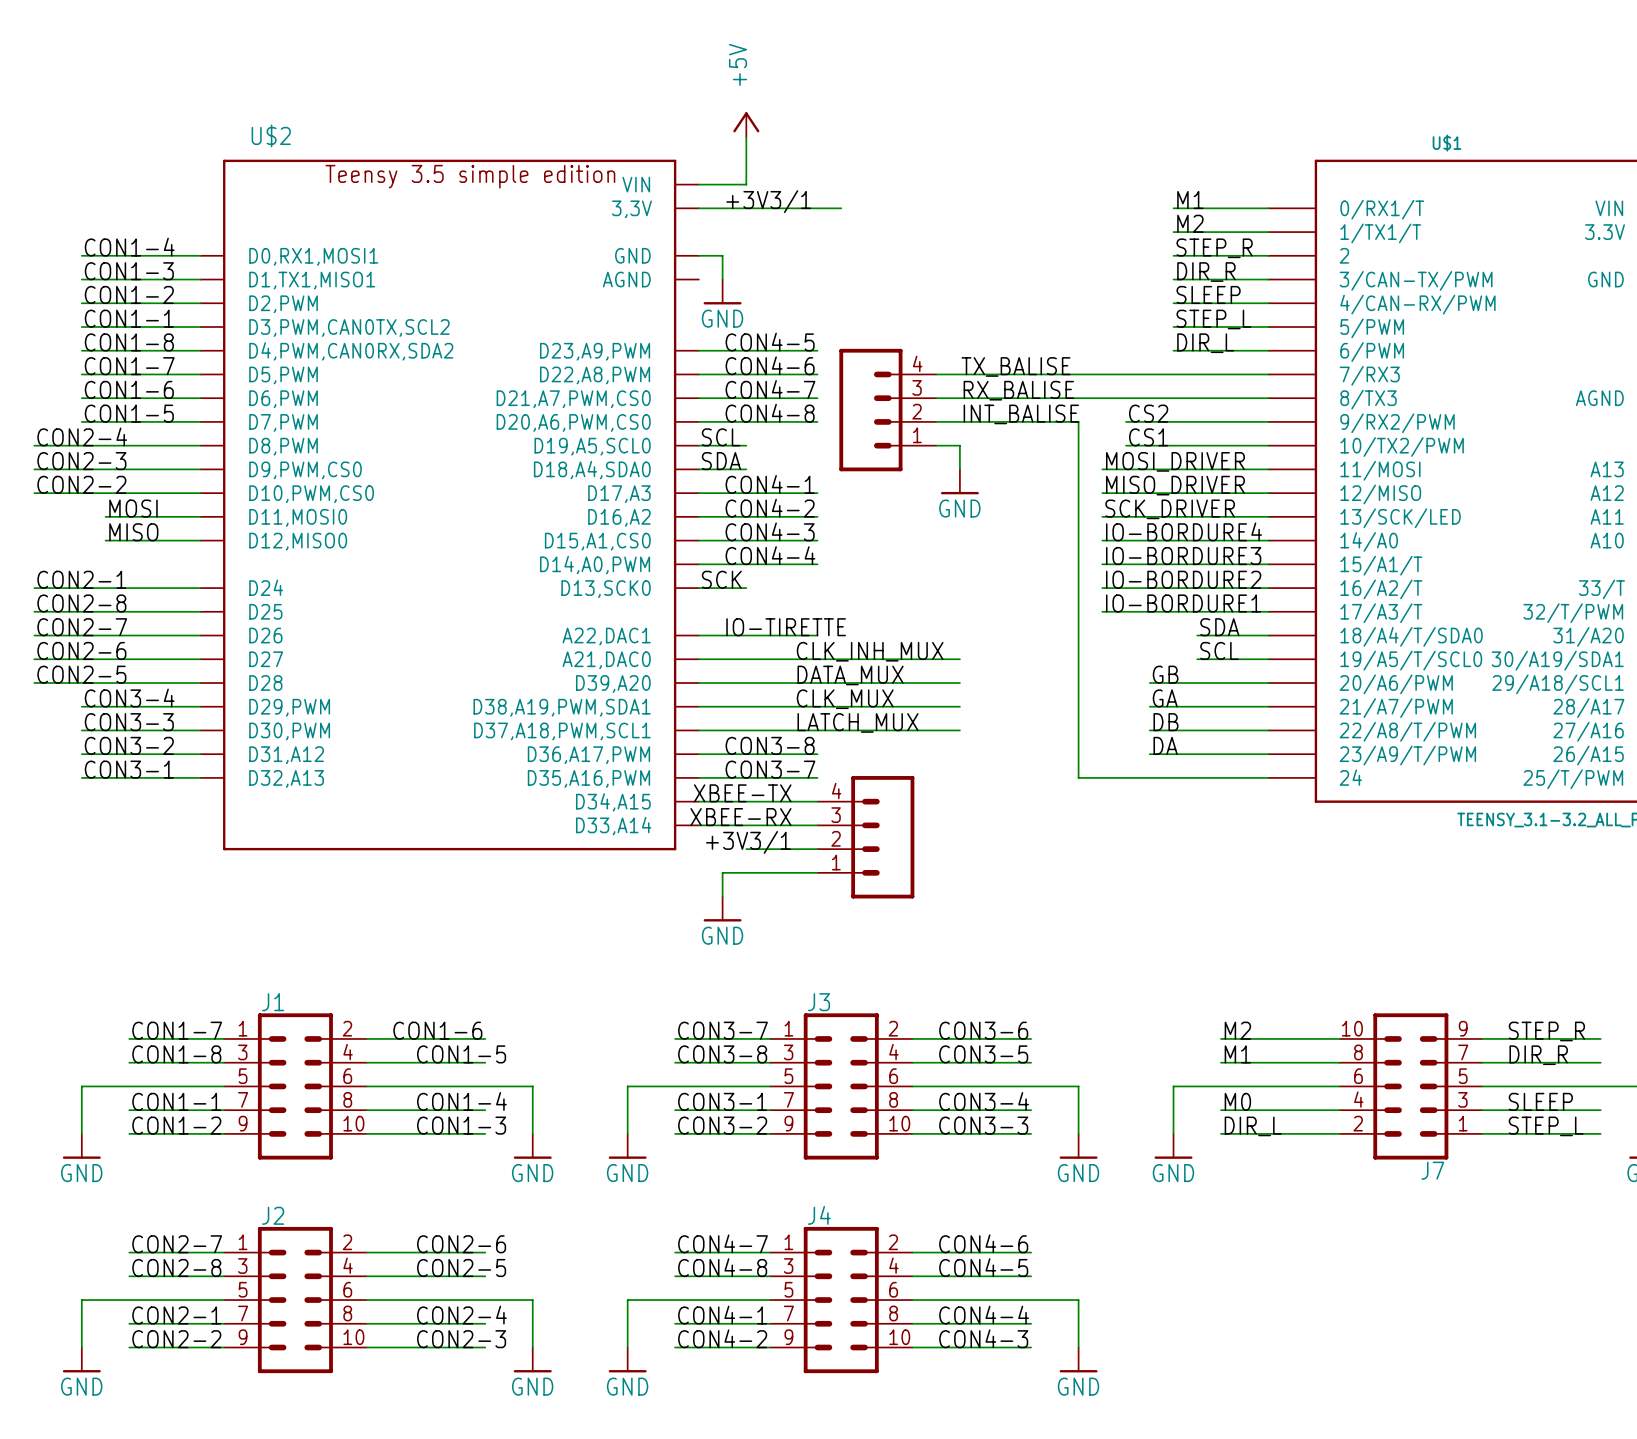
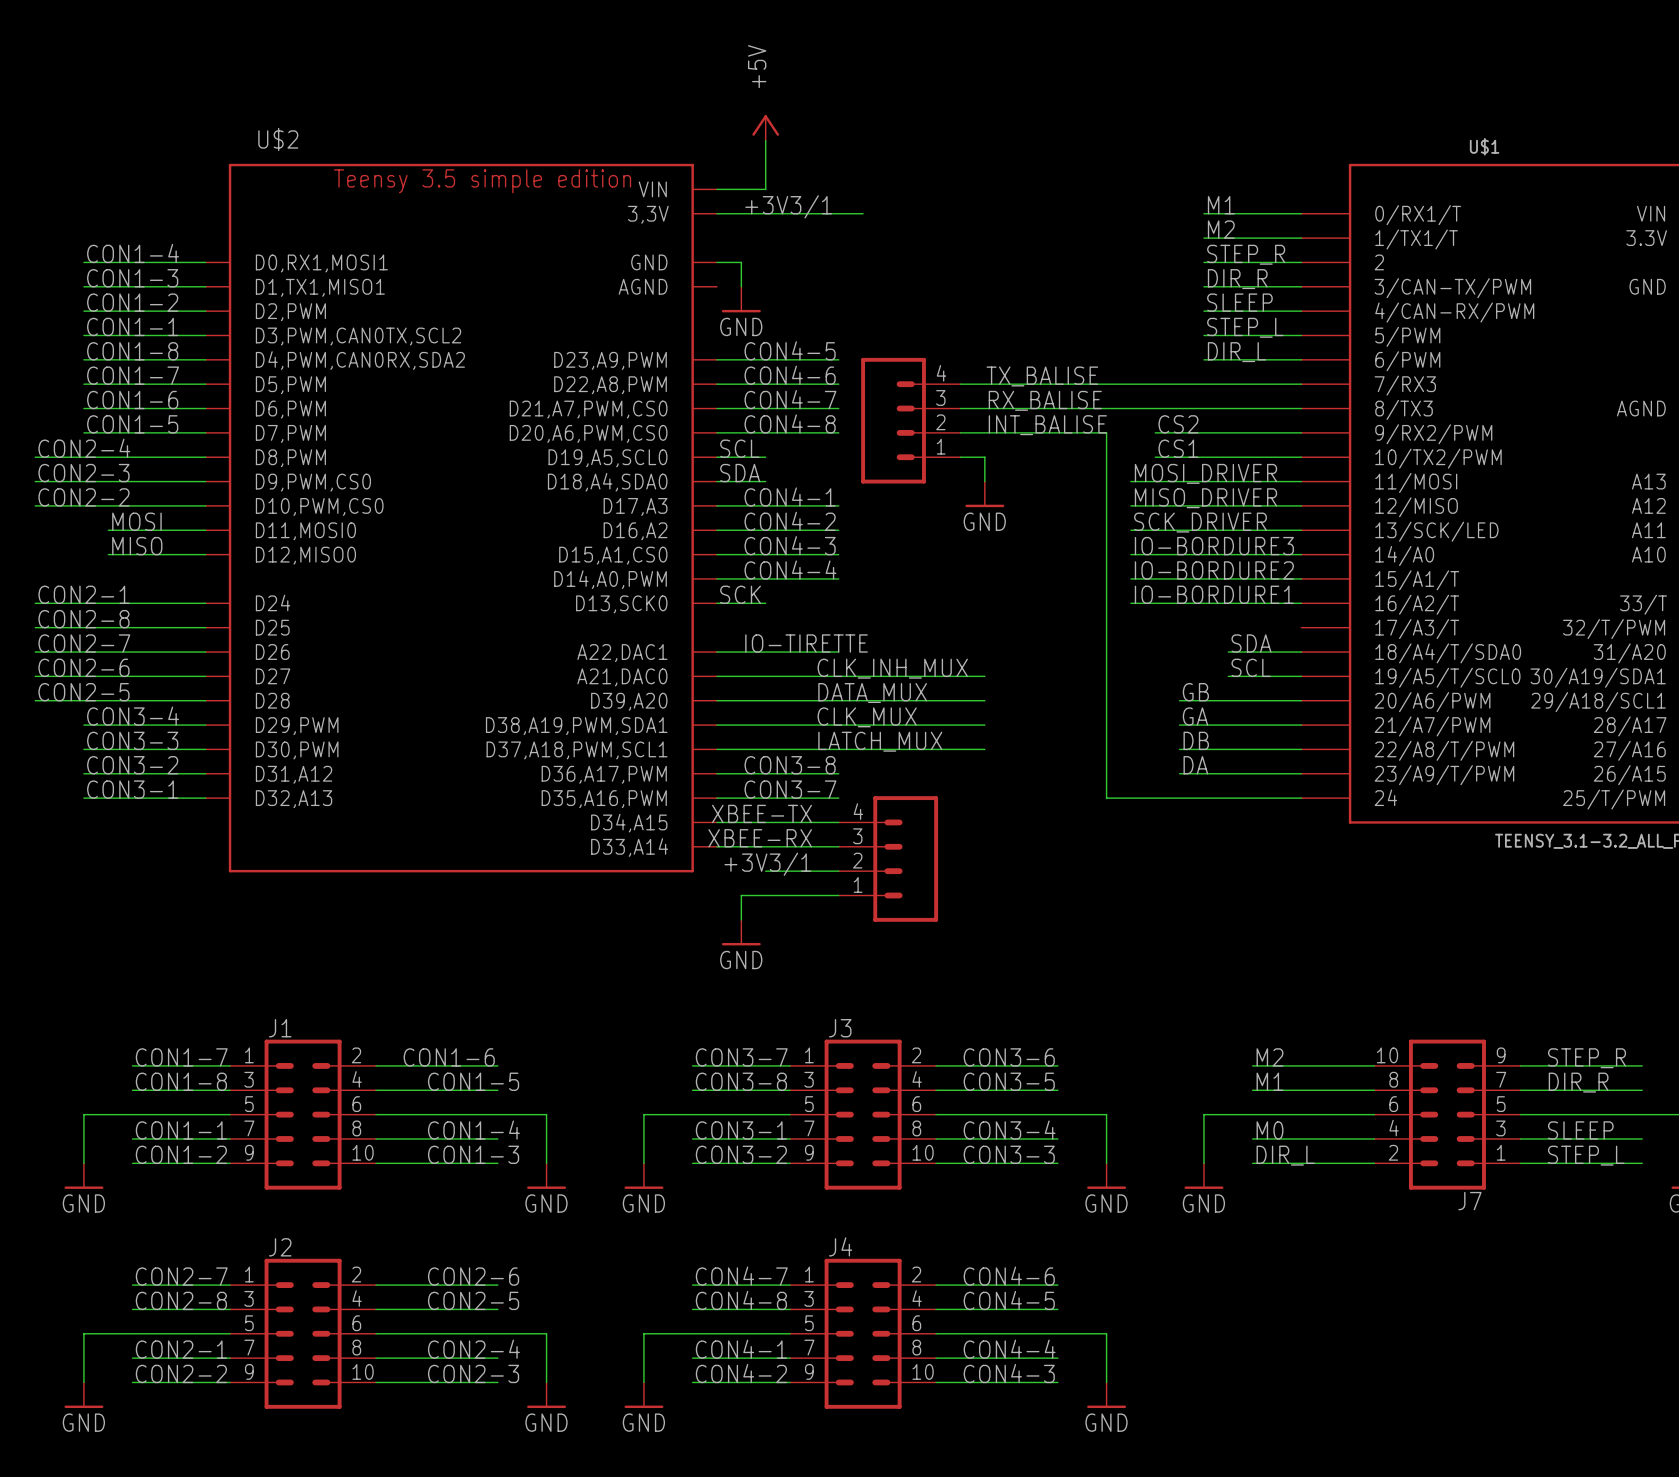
label: IO-BORDURE4 (1184, 531) -> IO-BORDURE3 (1214, 546)
label: IO-BORDURE3 (1183, 556) -> IO-BORDURE2 (1214, 570)
label: IO-BORDURE2 (1183, 579) -> IO-BORDURE1 (1214, 594)
label: IO-BORDURE1 (1183, 603) -> none
wire: (1102, 611) (1268, 611) -> none

